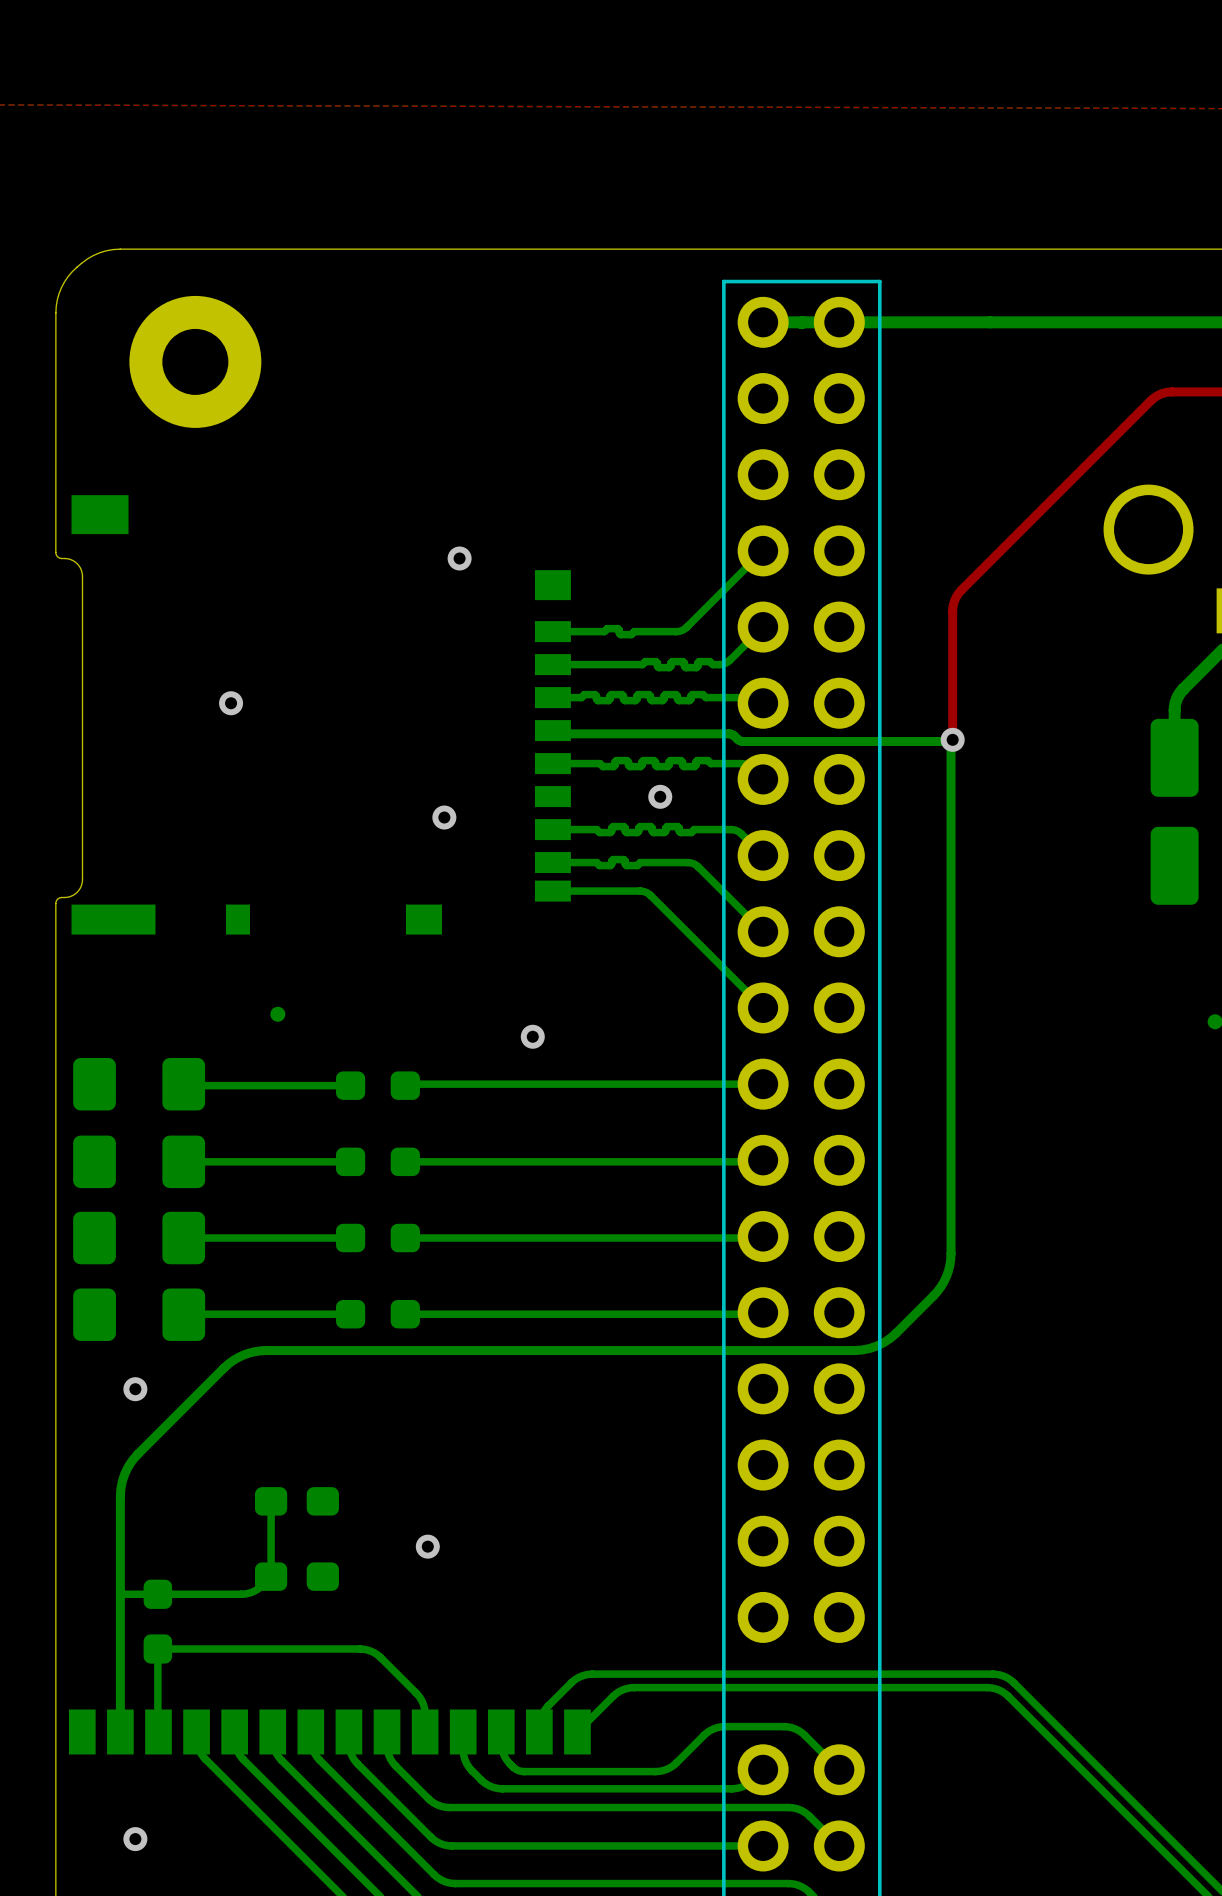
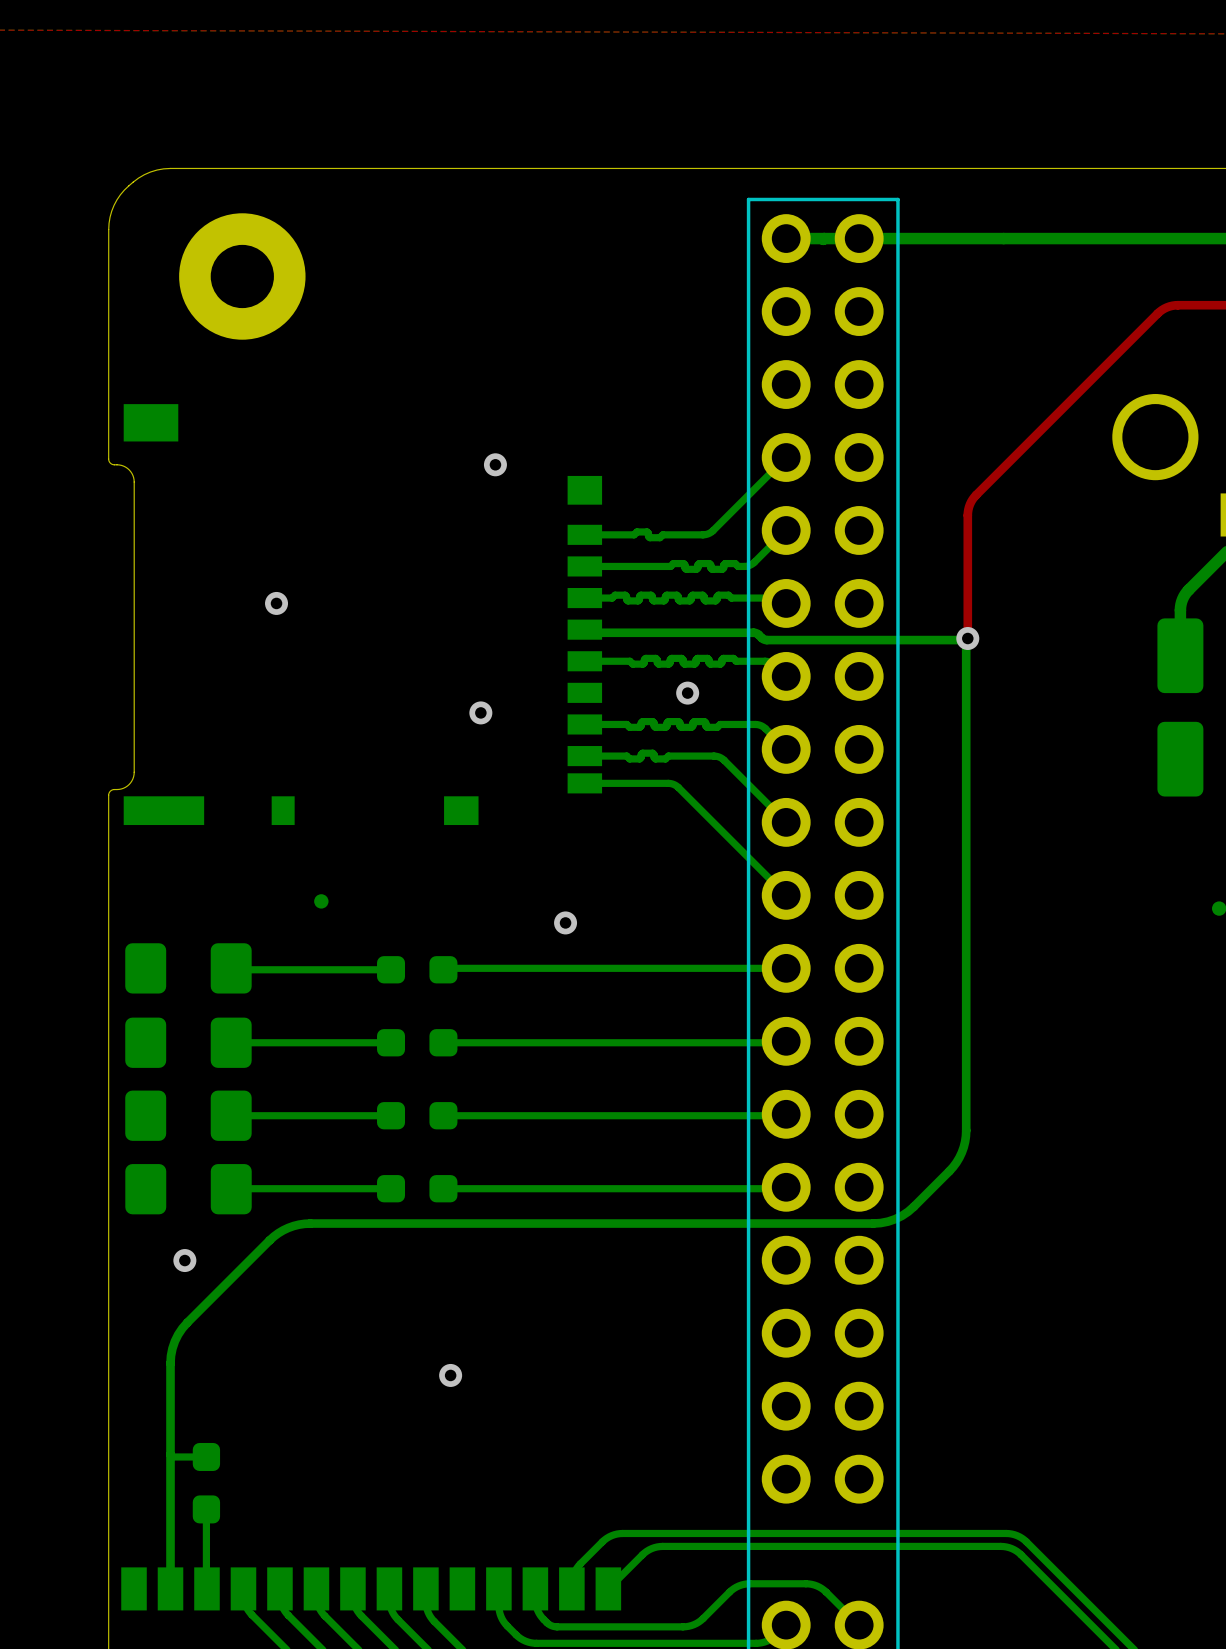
bottom track: (271, 1501) (271, 1576) (260, 1587) (243, 1594) (157, 1594) -> none
part: (296, 1501) -> none
via position: (427, 1546) -> (450, 1375)
part: (296, 1576) -> none
bottom track: (157, 1649) (368, 1650) (380, 1657) (420, 1697) (424, 1711) (425, 1731) -> none

